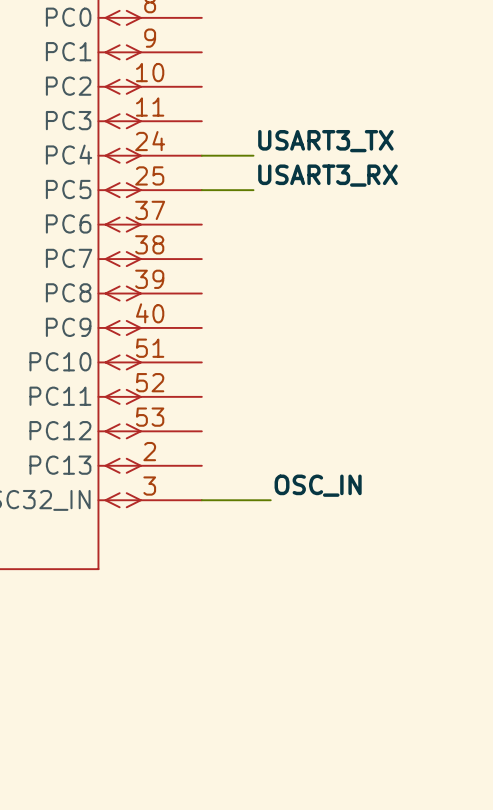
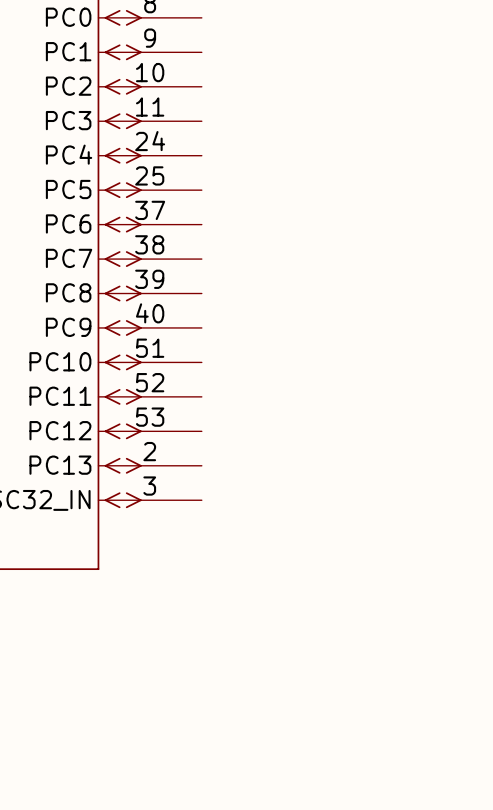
label: USART3_TX (325, 141) -> none
wire: (201, 155) (253, 155) -> none
label: USART3_RX (327, 175) -> none
wire: (201, 190) (253, 190) -> none
label: OSC_IN (318, 485) -> none
wire: (201, 500) (270, 500) -> none

